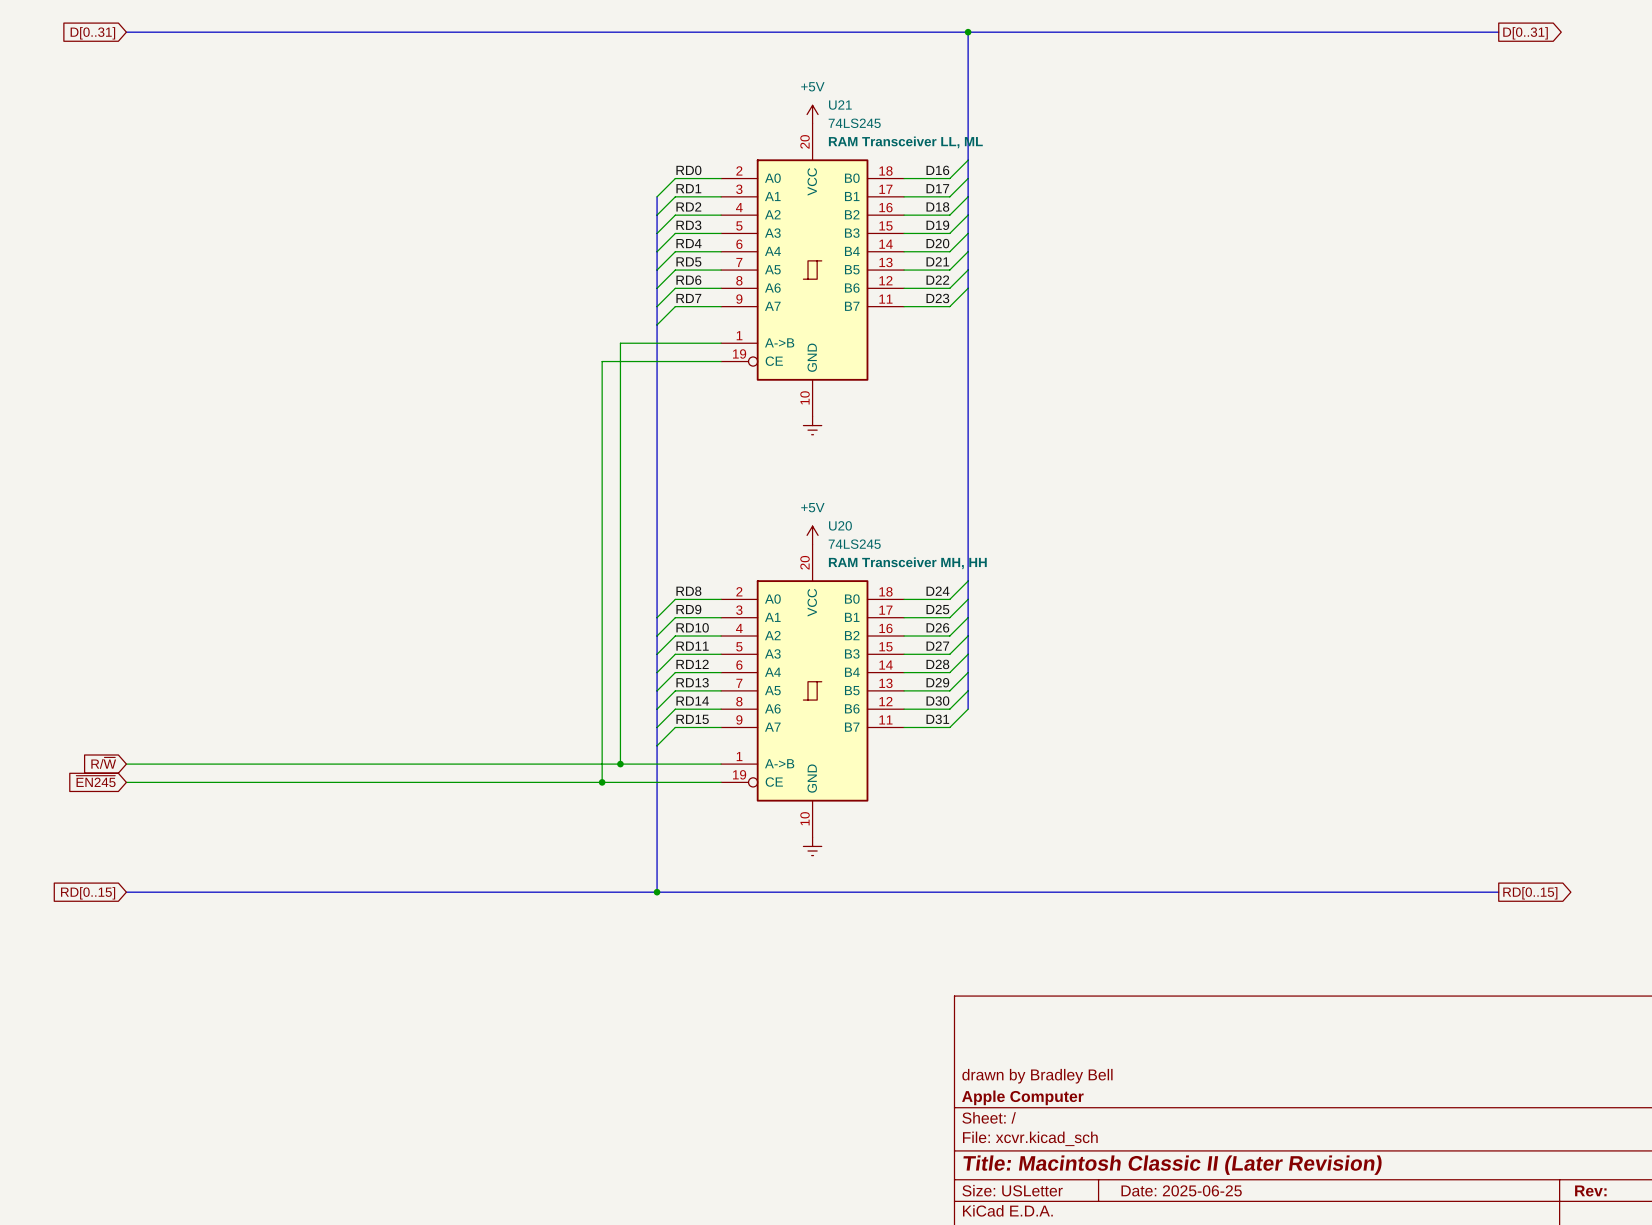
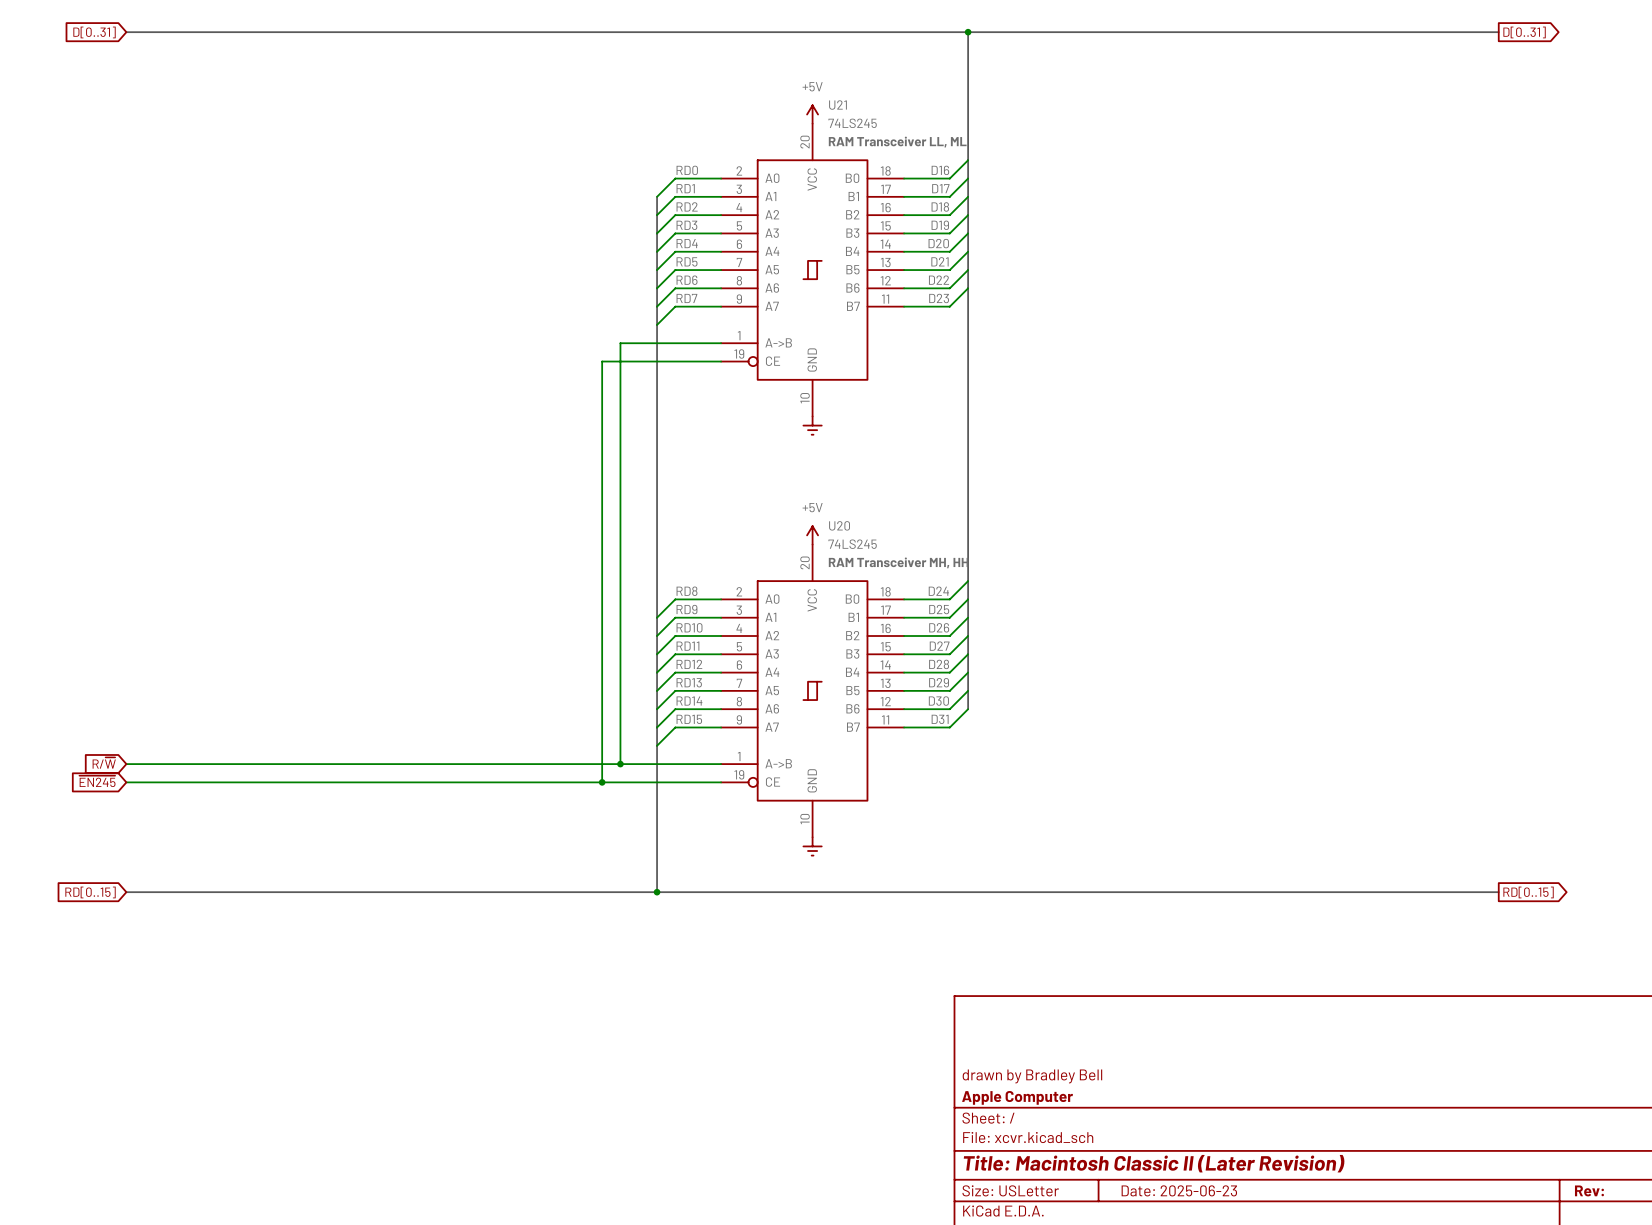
title block: Date: 2025-06-25 (1181, 1190) -> Date: 2025-06-23 (1179, 1190)

